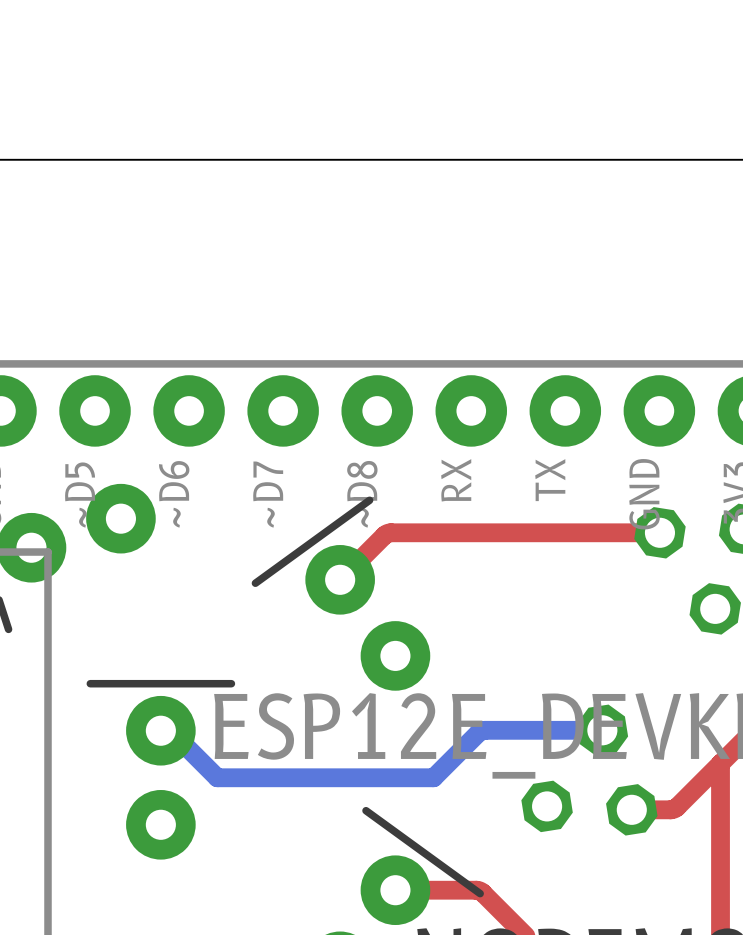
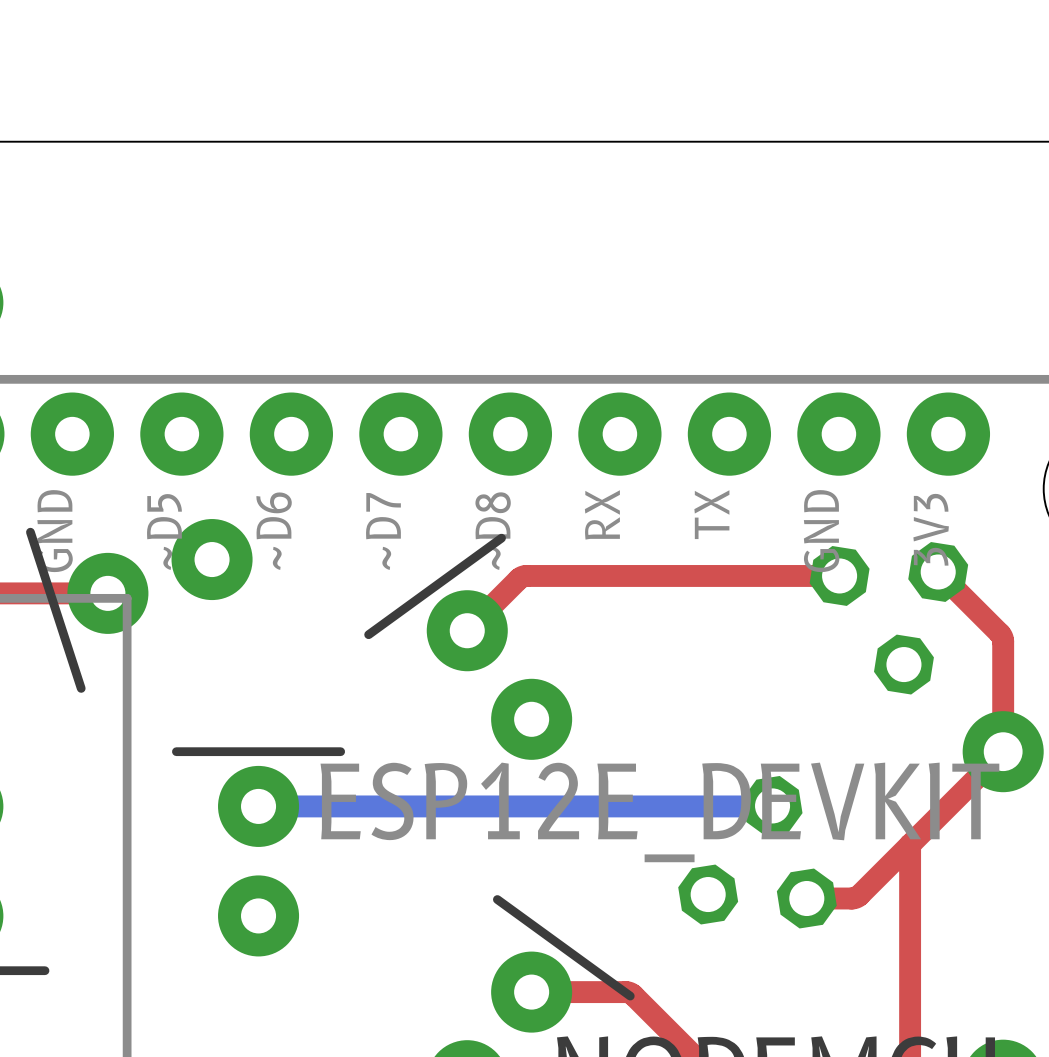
bottom track: (602, 730) (482, 730) (433, 777) (217, 777) (173, 733) (166, 730) -> (772, 806) (264, 806)

